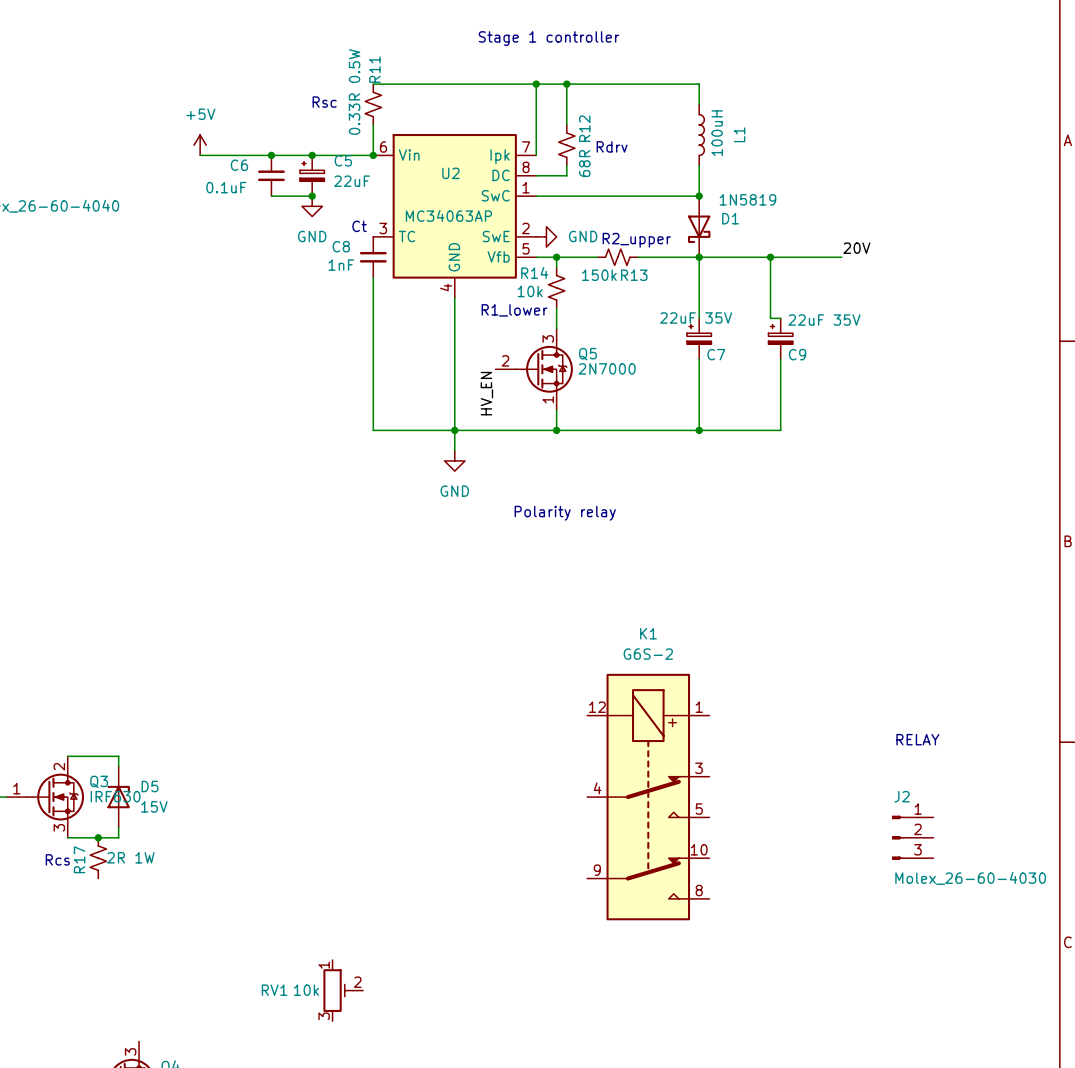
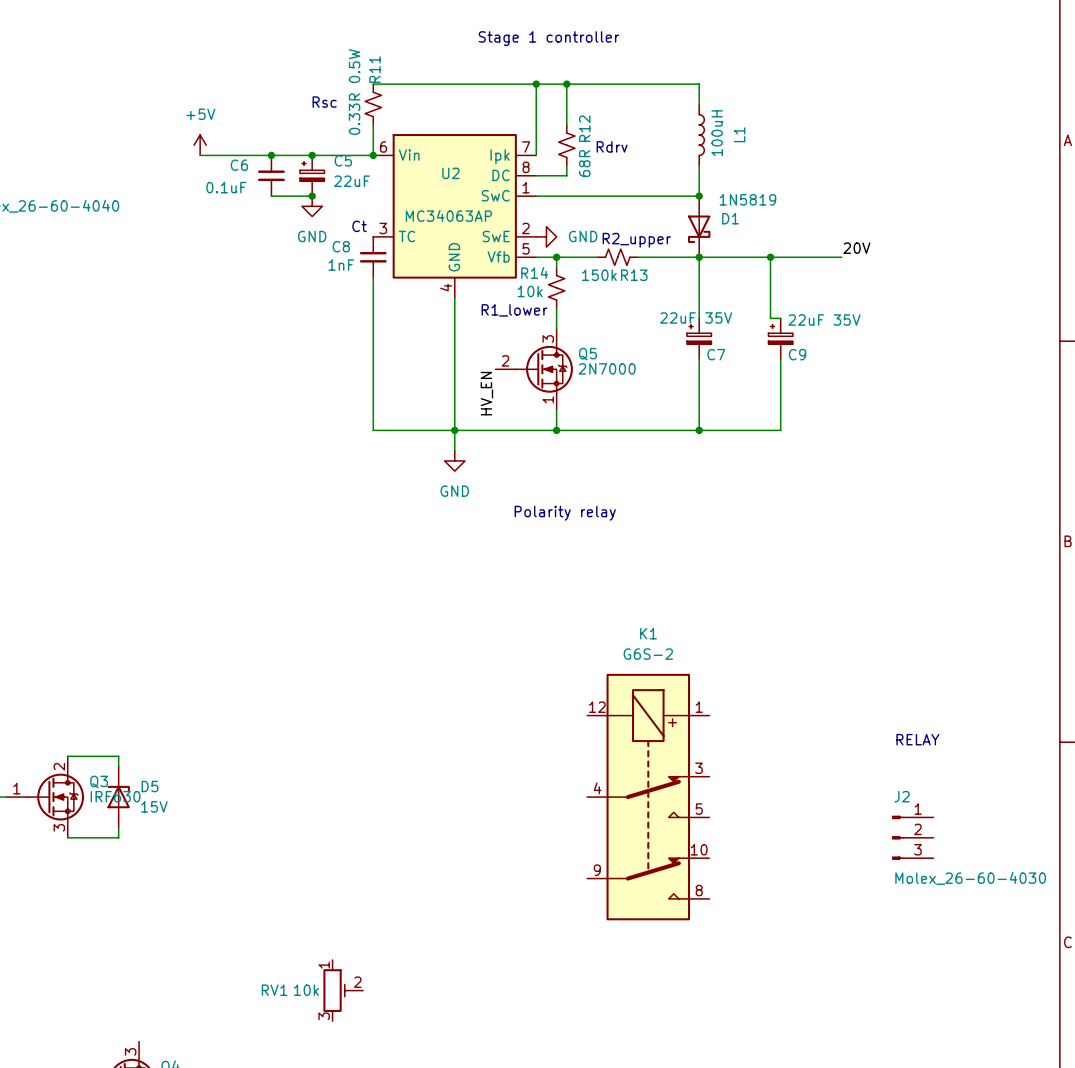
junction: (98, 837) -> none
R17: 2R 1W (98, 858) -> none
text: Rcs (57, 859) -> none

